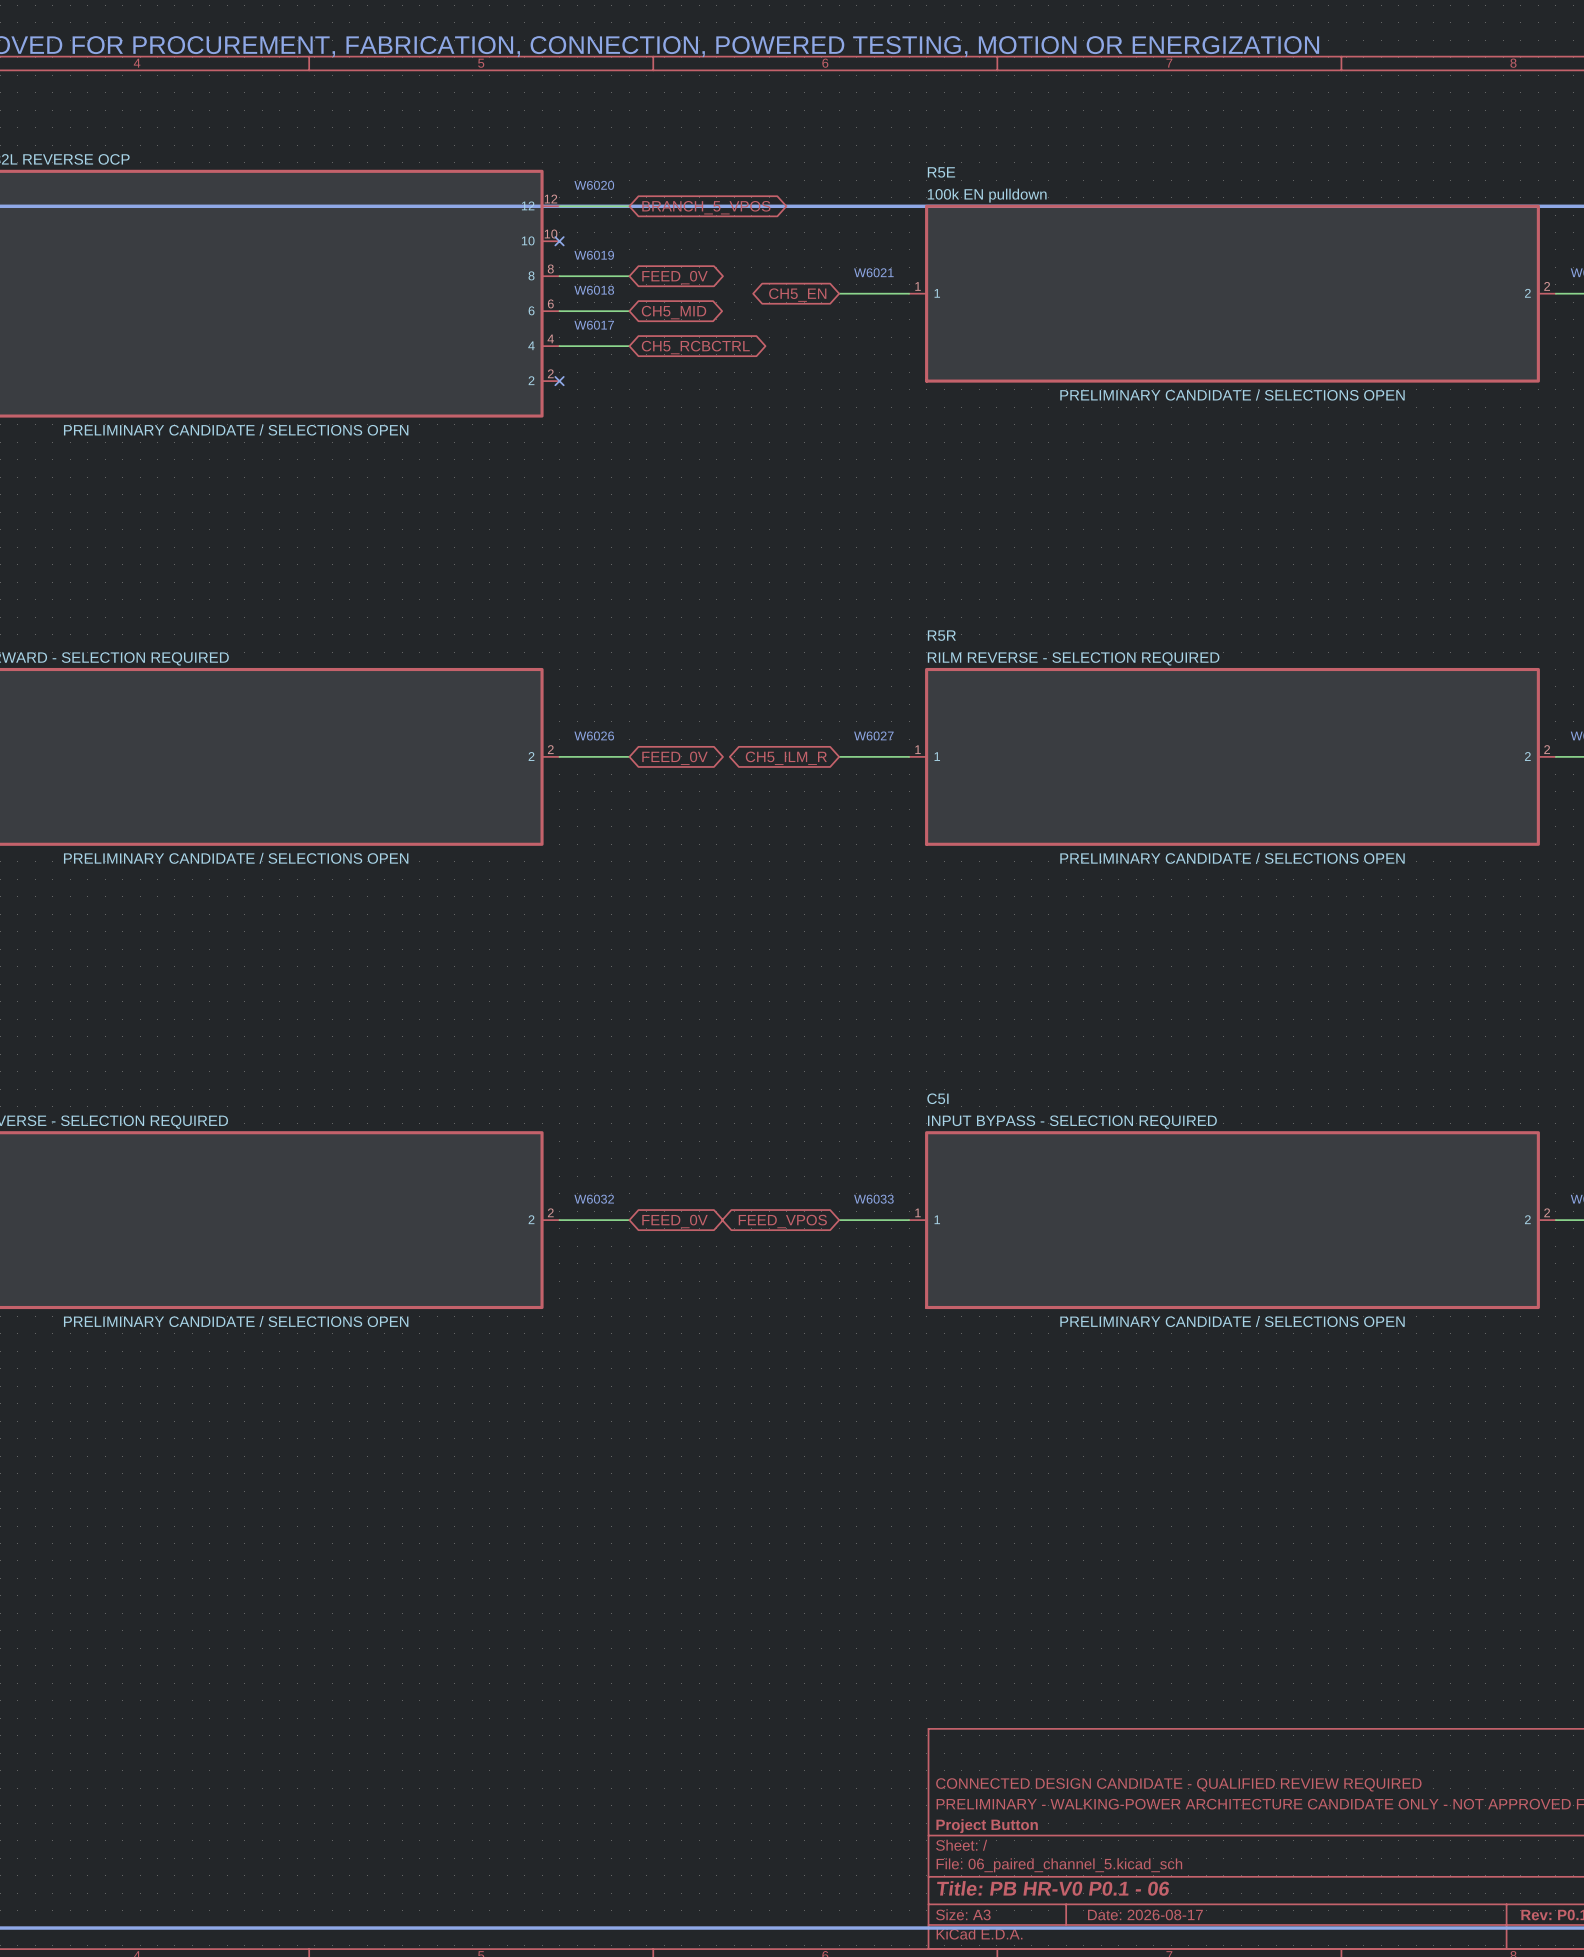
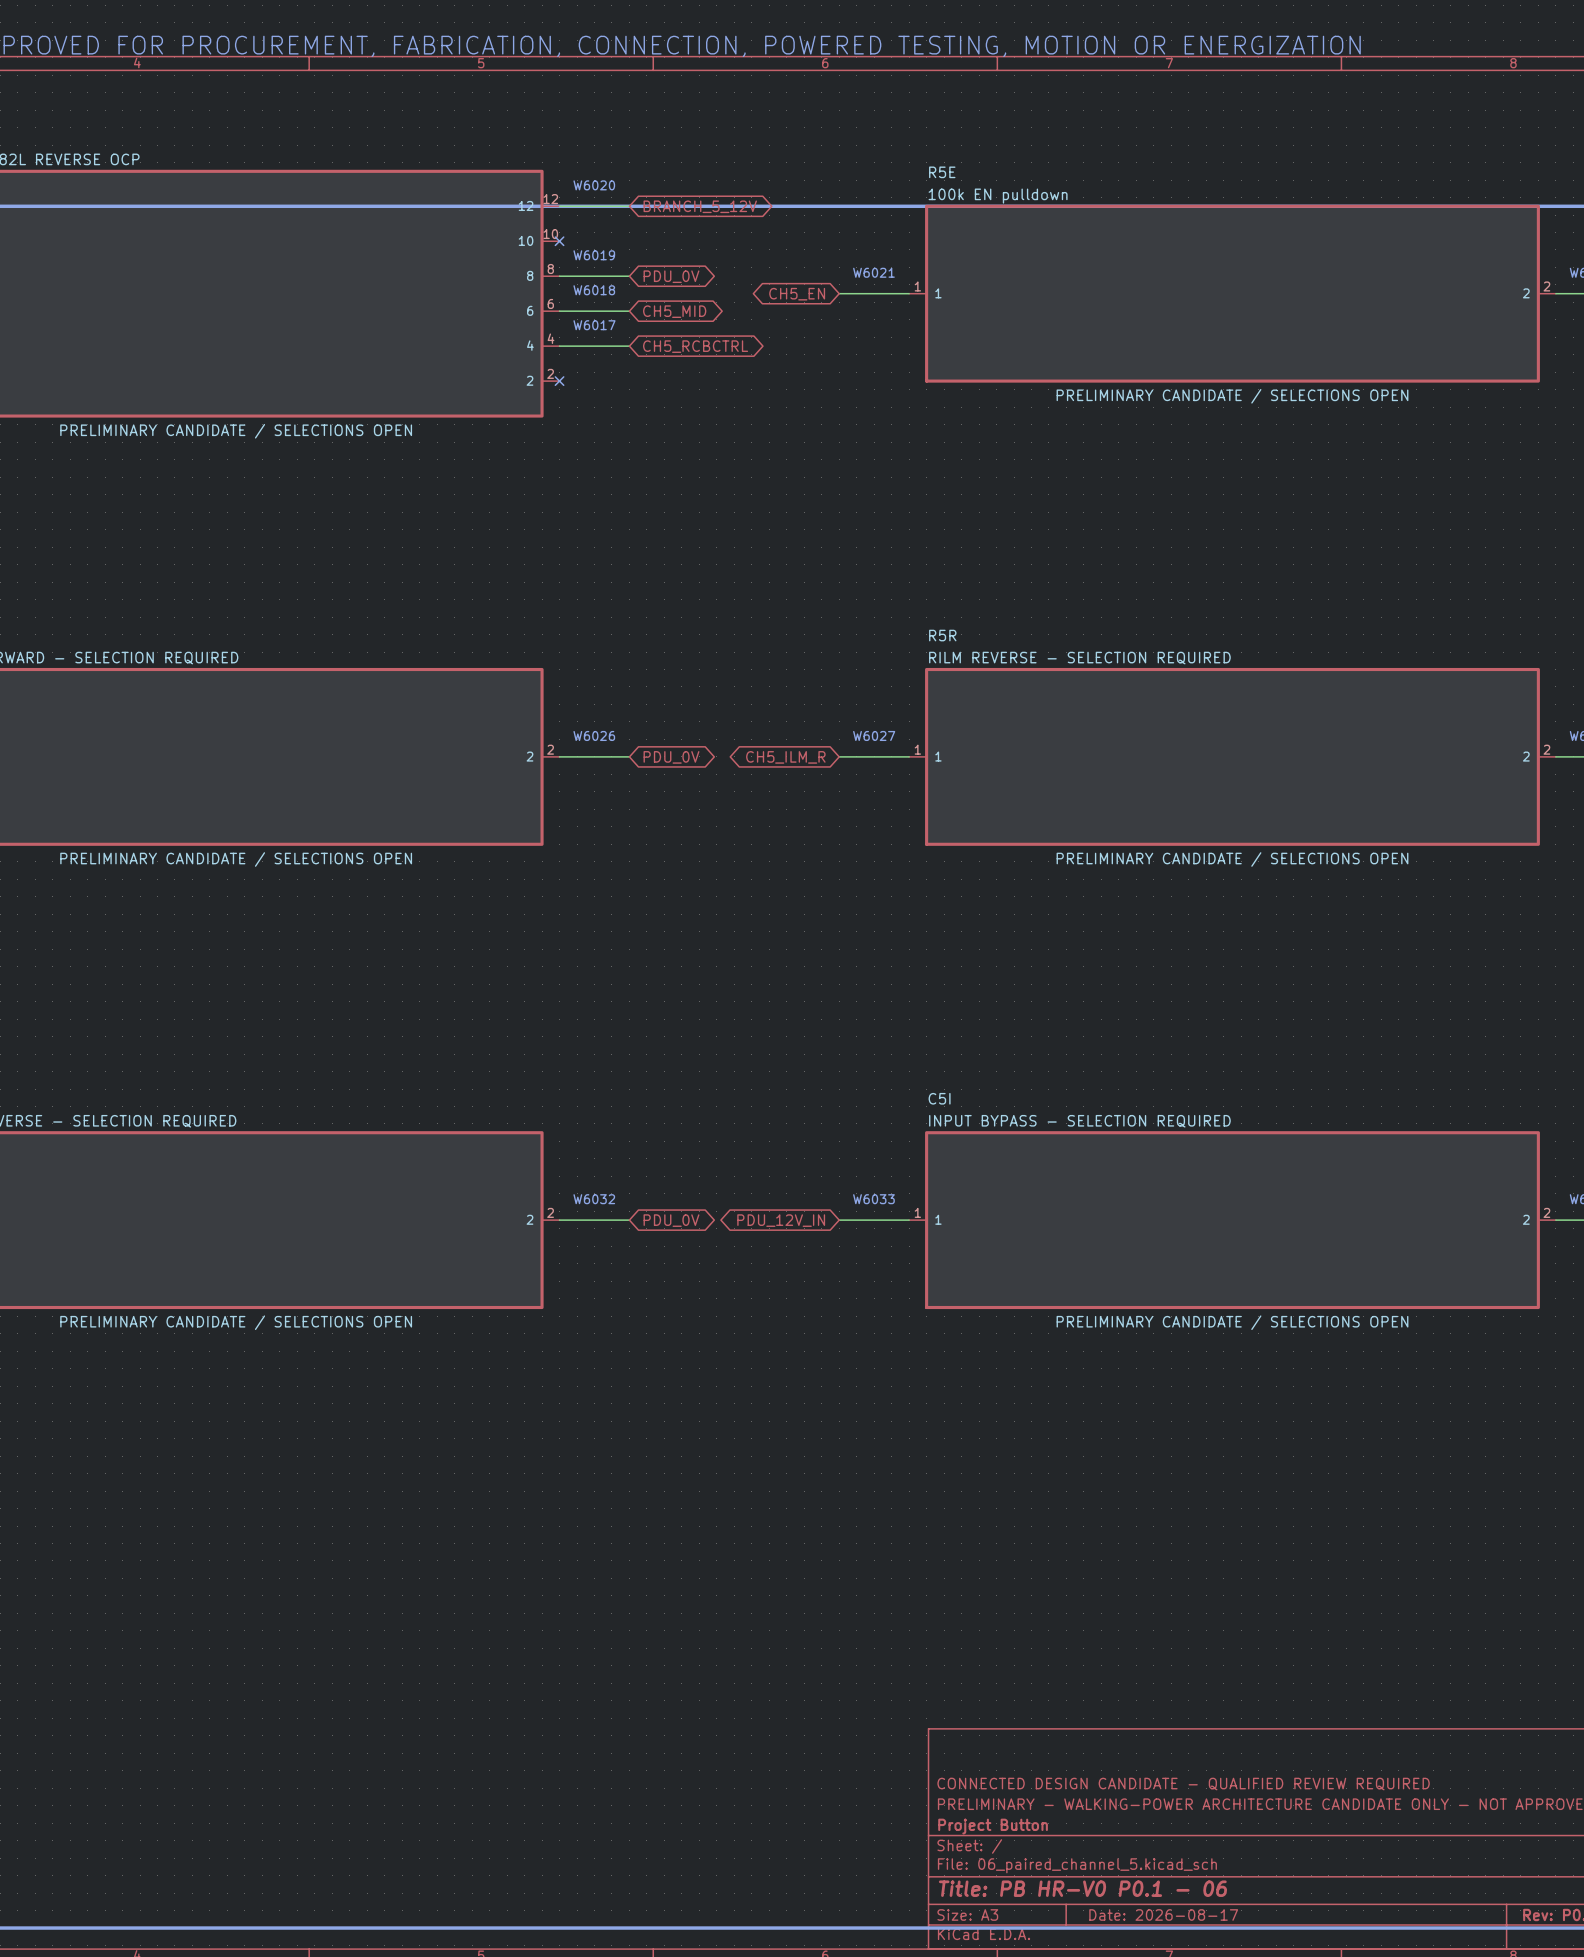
global label: BRANCH_5_VPOS (706, 207) -> BRANCH_5_12V (700, 206)
global label: FEED_0V (675, 277) -> PDU_0V (671, 276)
global label: FEED_0V (675, 758) -> PDU_0V (671, 757)
global label: FEED_0V (675, 1221) -> PDU_0V (671, 1220)
global label: FEED_VPOS (782, 1221) -> PDU_12V_IN (781, 1220)

